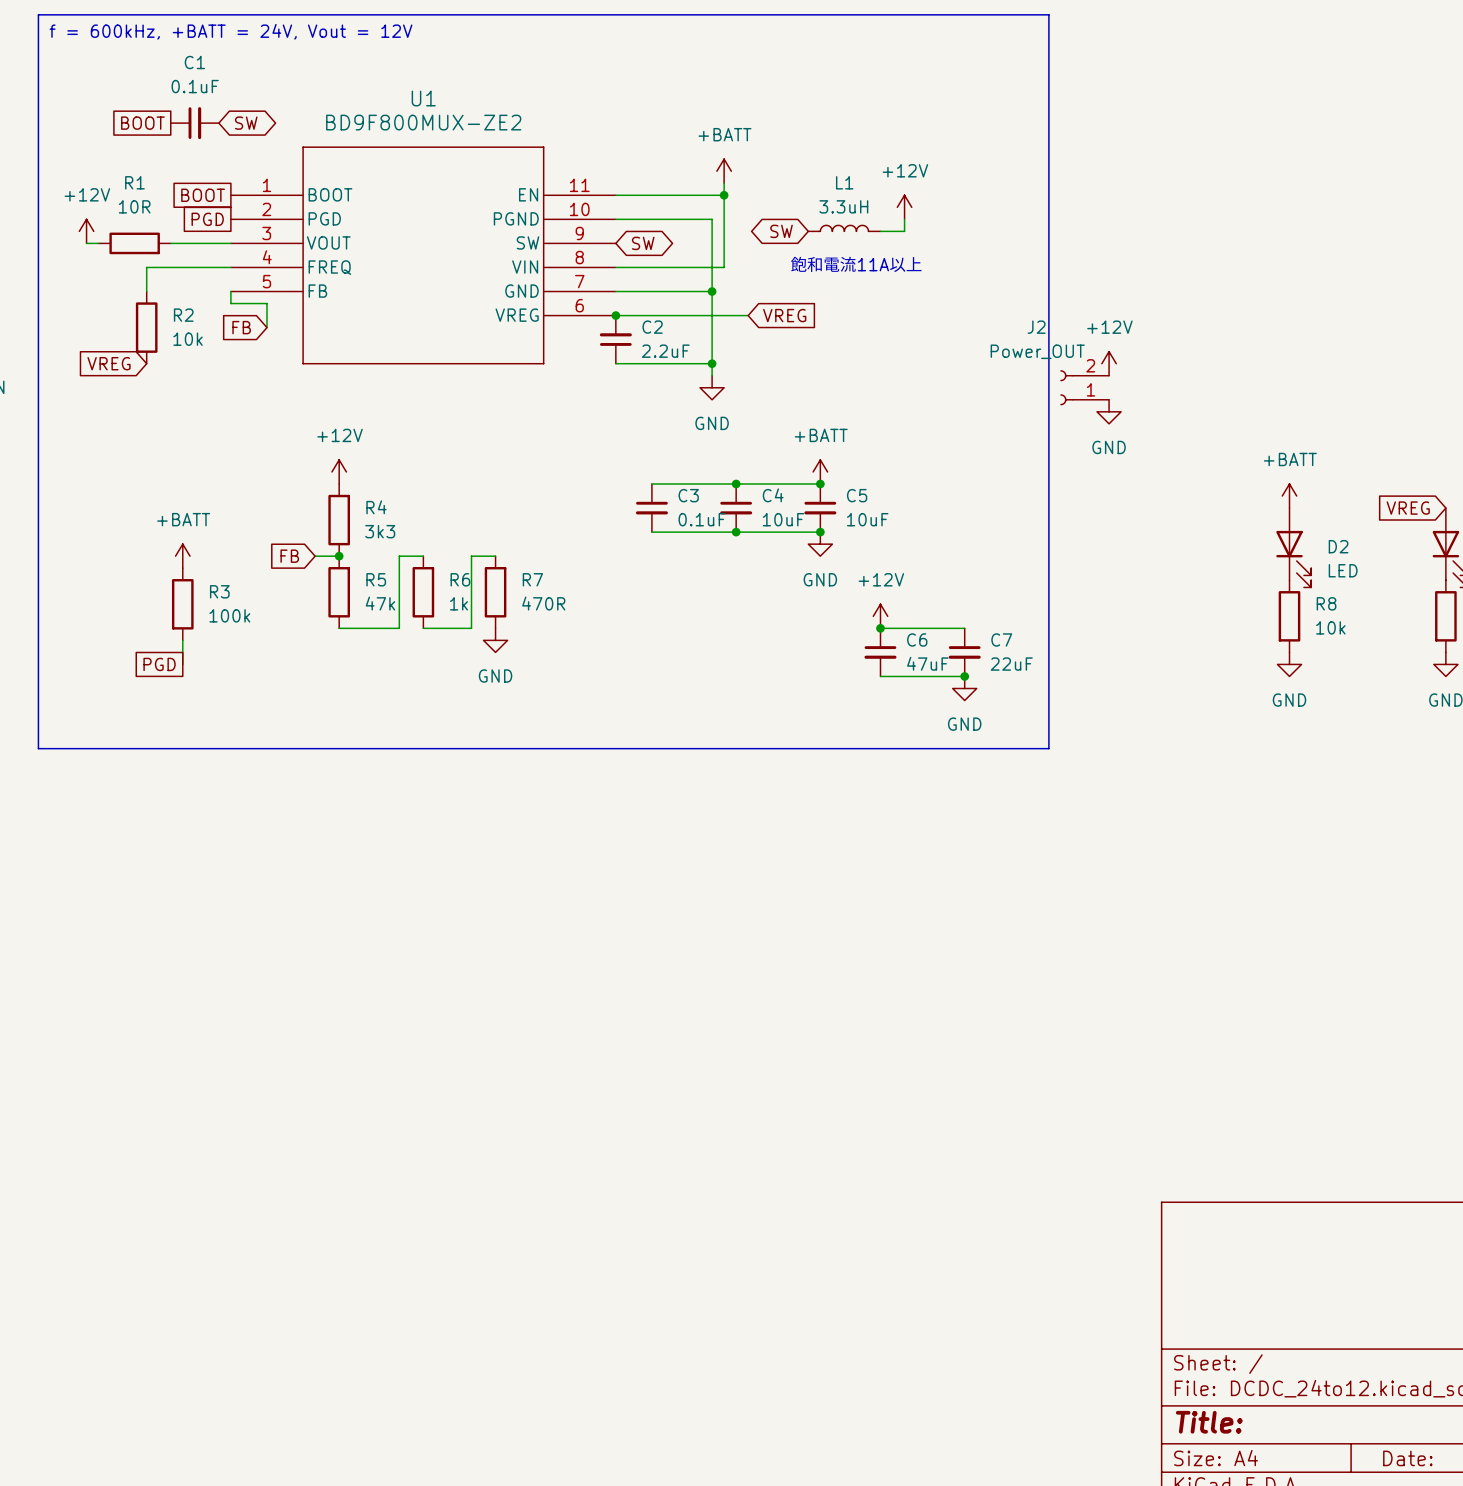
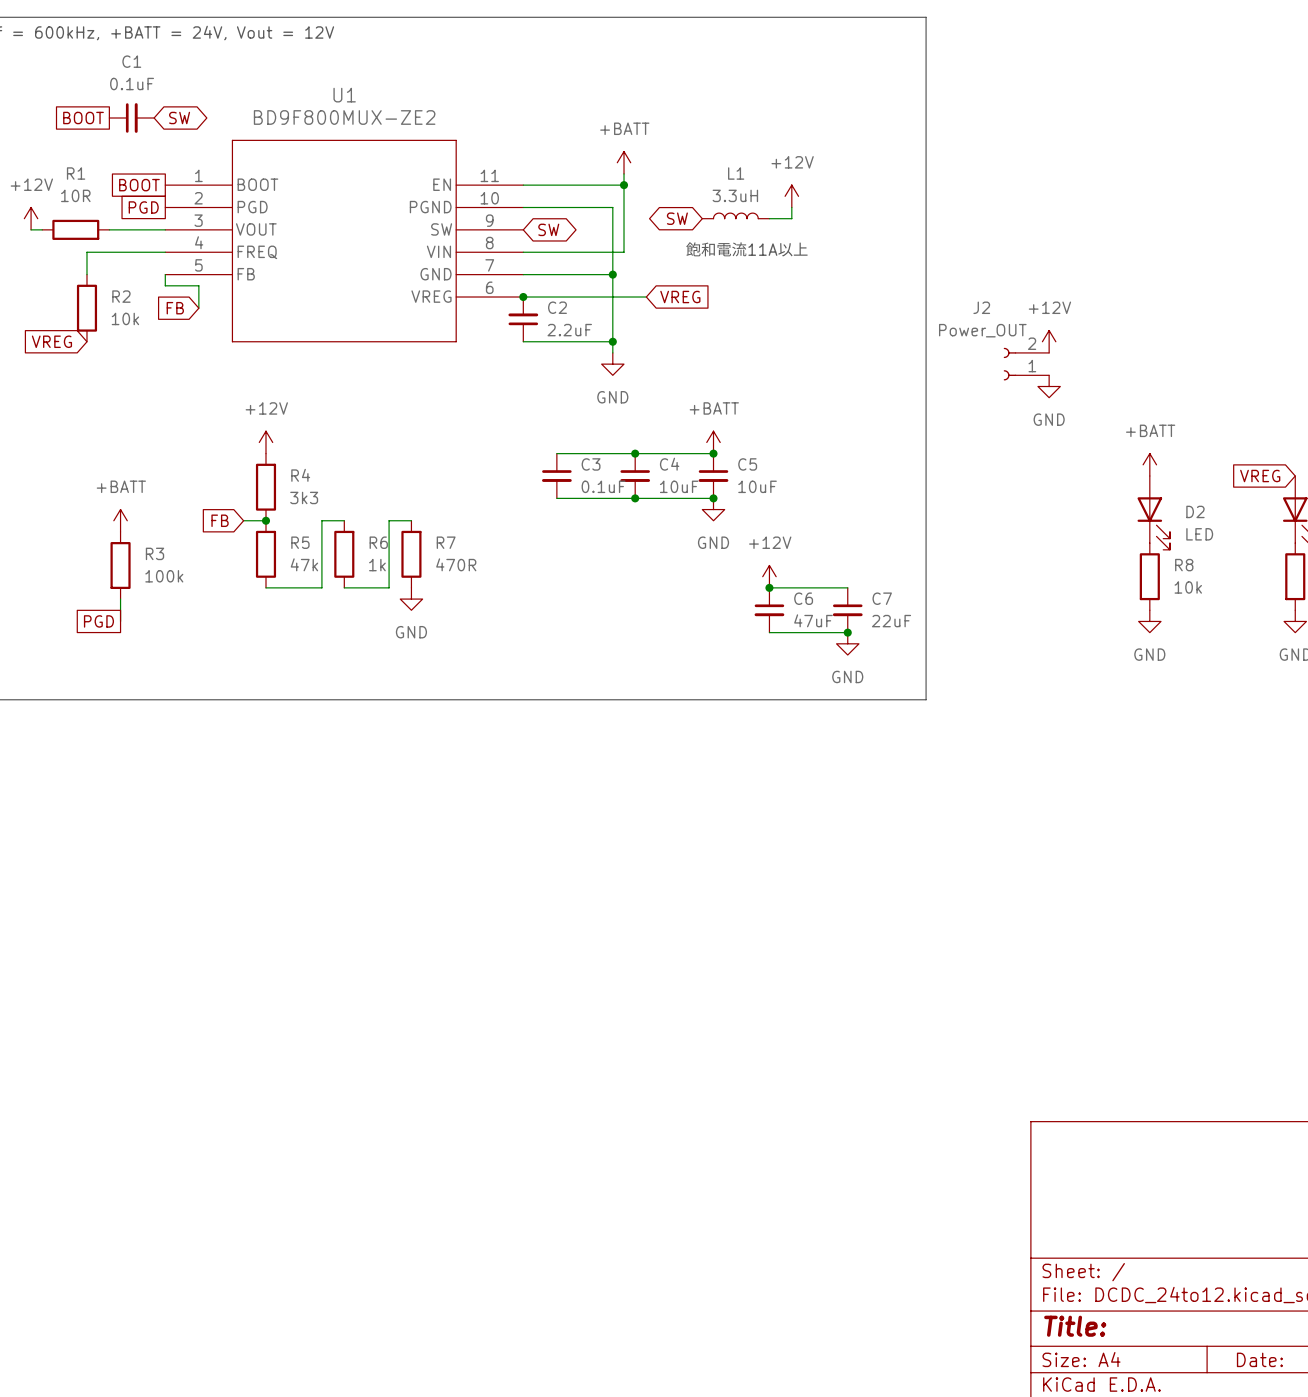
power symbol position: +12V (1109, 363) -> +12V (1049, 341)
J2 position: (1084, 387) -> (1026, 364)
power symbol position: GND (1109, 411) -> GND (1049, 386)

